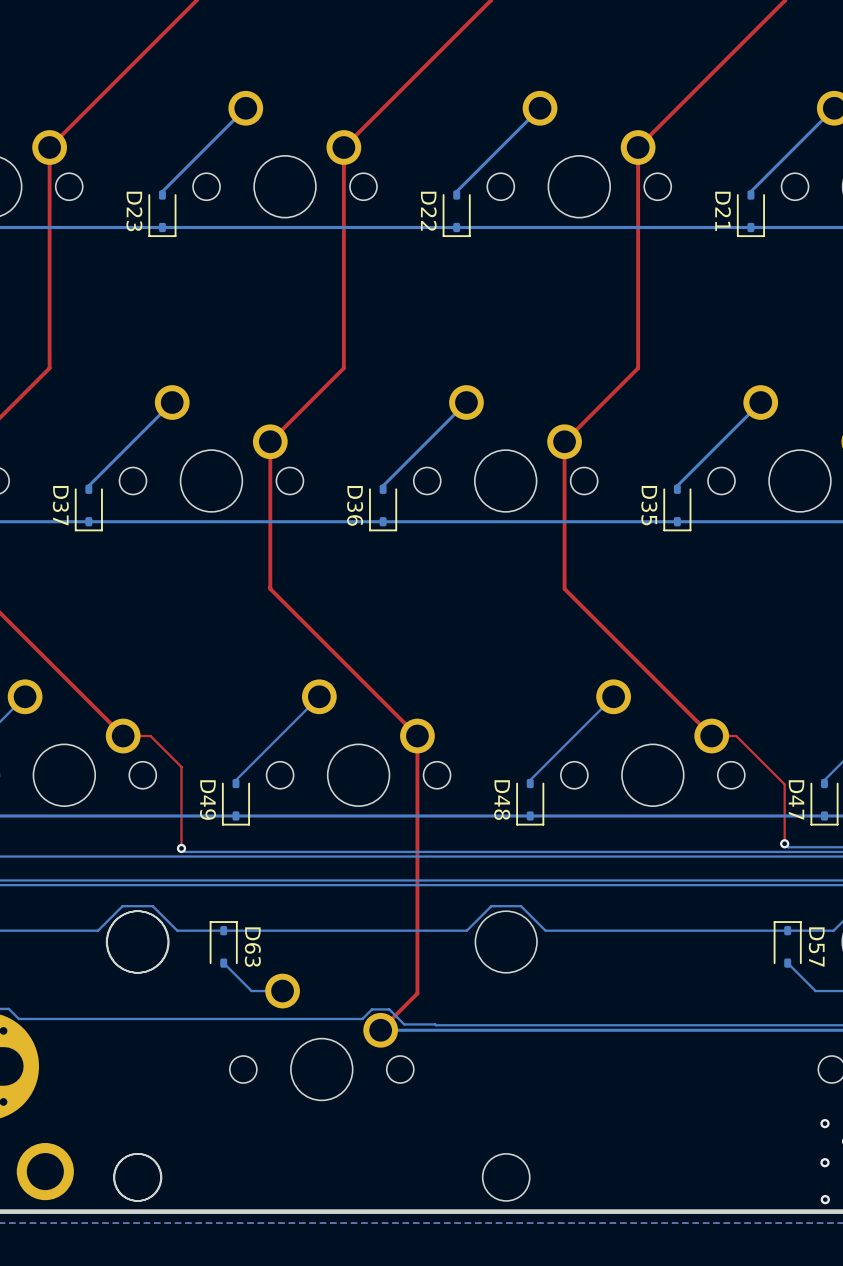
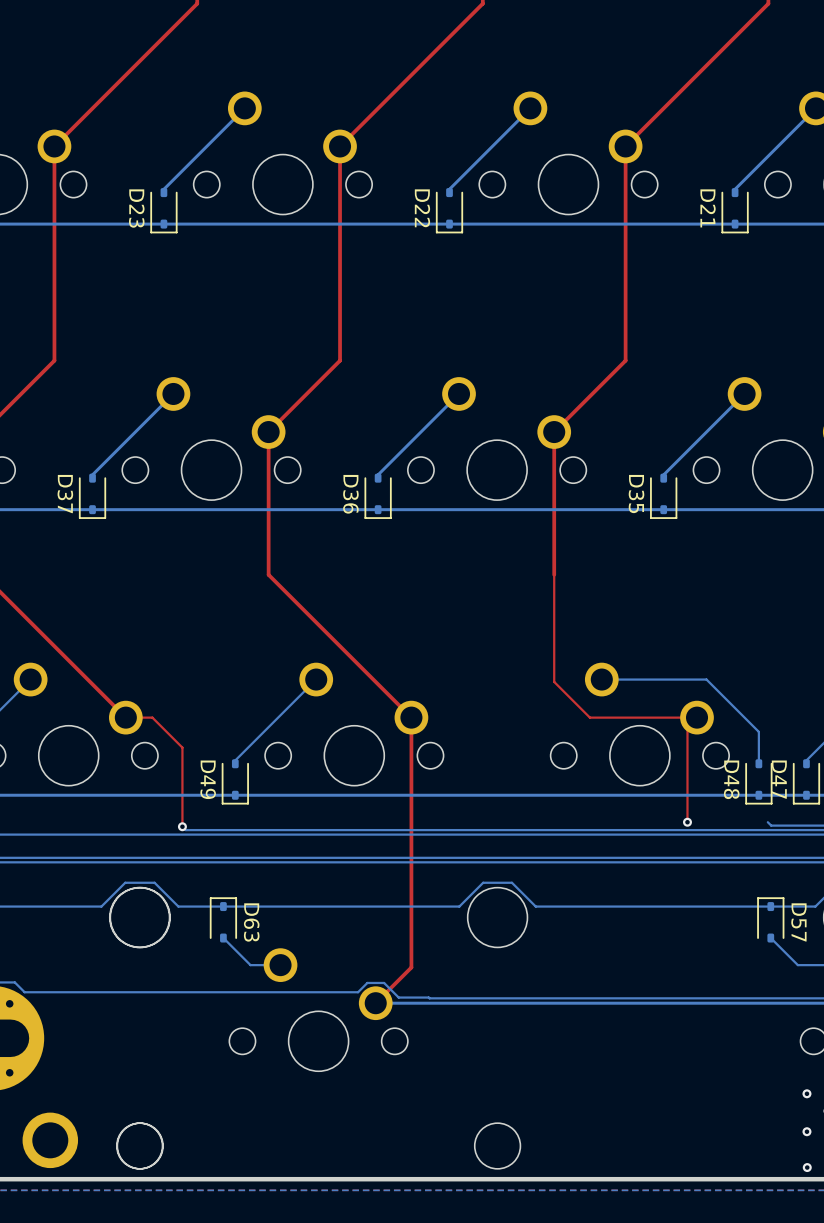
top track: (564, 588) (711, 736) (736, 736) (784, 784) (784, 843) -> (554, 574) (554, 681) (589, 717) (697, 717) (687, 727) (687, 822)
bottom track: (613, 696) (530, 780) (530, 783) -> (601, 679) (706, 679) (758, 731) (758, 763)
D48 position: (530, 802) -> (758, 781)
via position: (784, 843) -> (687, 822)

